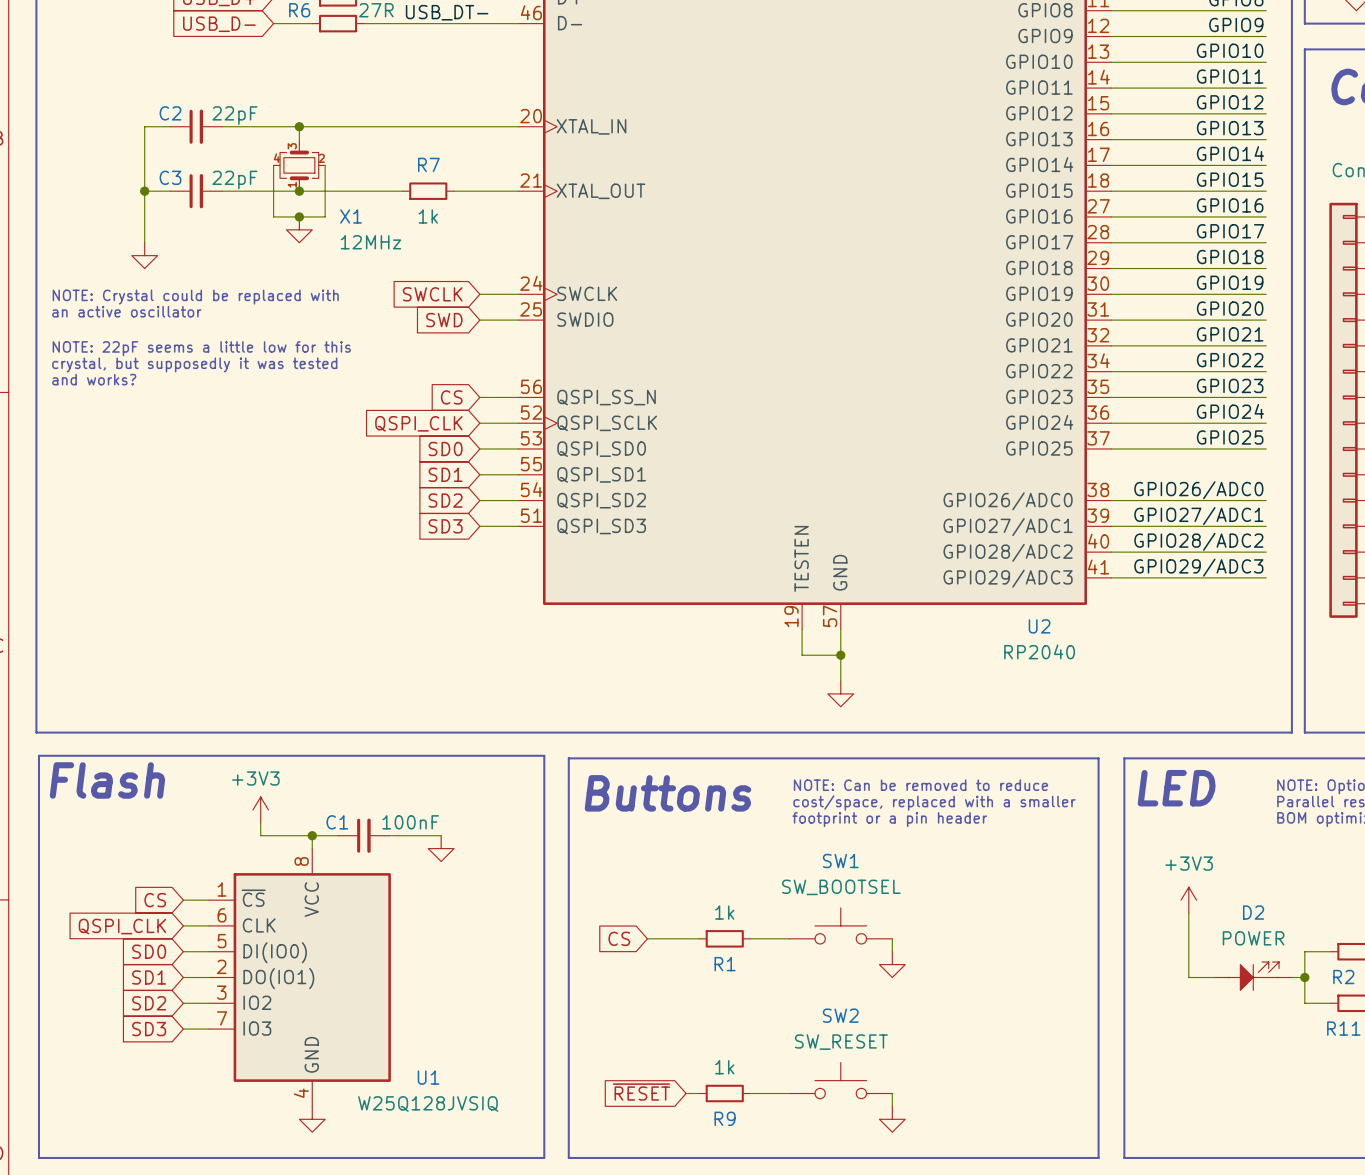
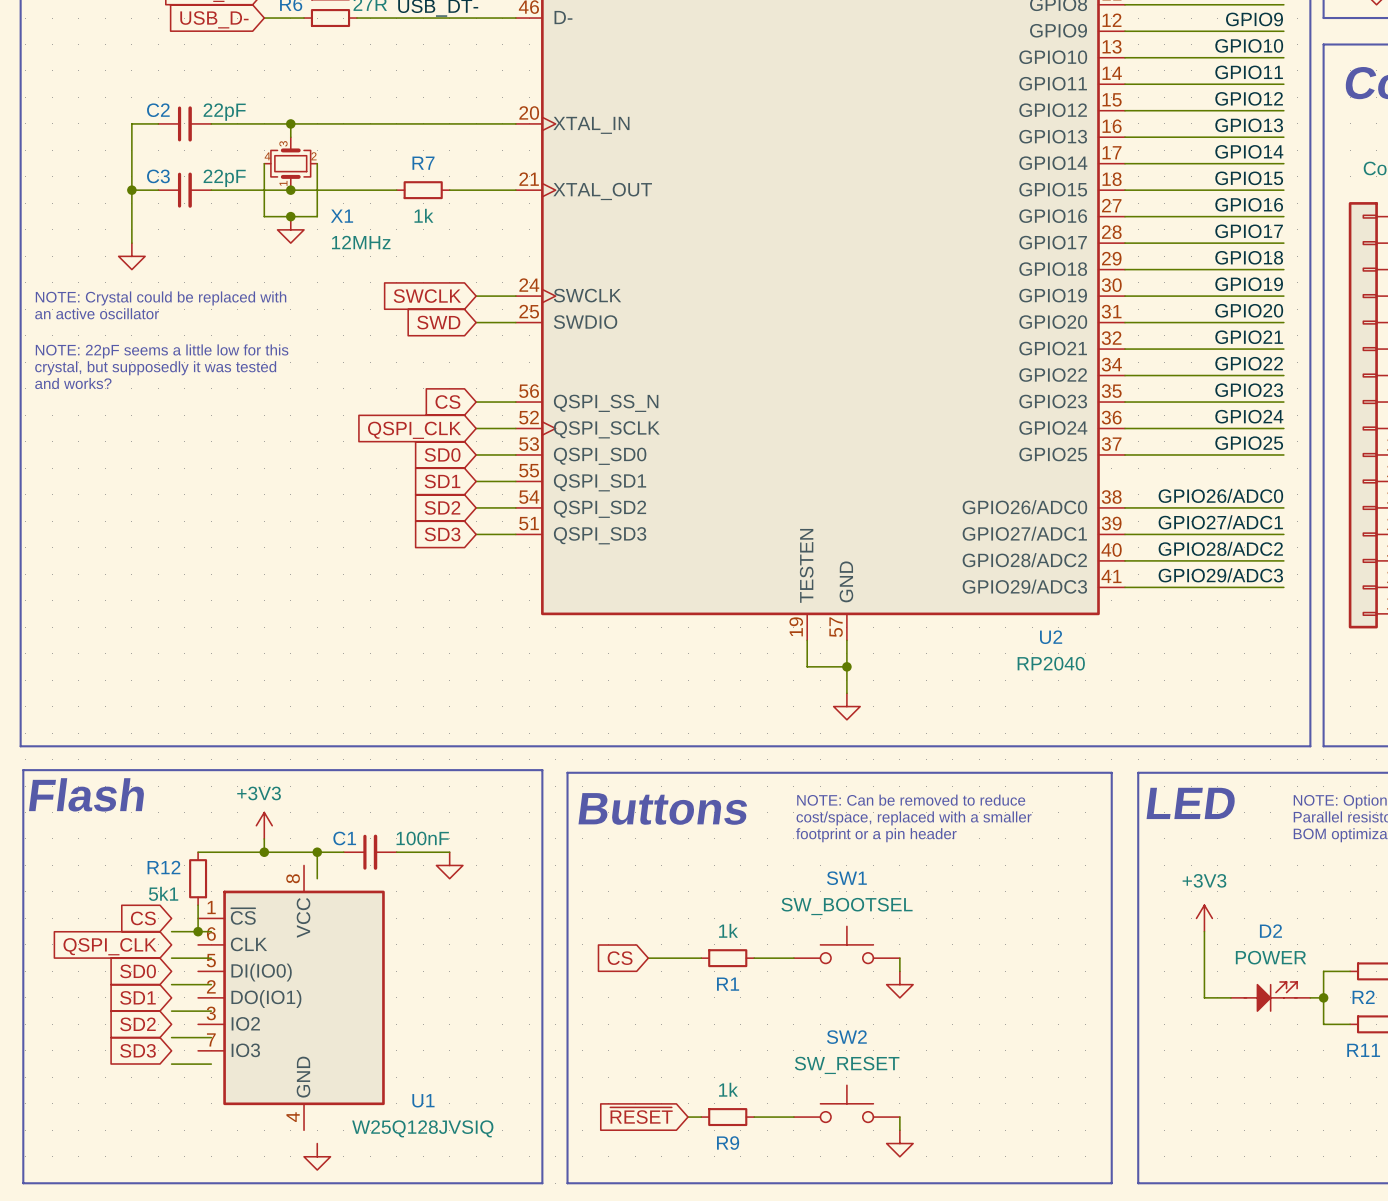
power symbol position: +3V3 (260, 809) -> +3V3 (264, 825)
wire: (260, 822) (260, 835) -> (198, 852) (251, 852)
junction: none -> (264, 852)
wire: (312, 835) (312, 848) -> (264, 838) (264, 852)
junction position: (312, 835) -> (317, 852)
wire: none -> (317, 852) (317, 878)
C1 position: (363, 835) -> (370, 852)
wire: none -> (436, 852) (449, 852)
power symbol position: (441, 848) -> (449, 865)
R12: none -> 5k1 (198, 878)
wire: none -> (198, 905) (198, 931)
wire: (183, 900) (209, 900) -> none
wire: none -> (171, 931) (211, 931)
junction: none -> (198, 931)
wire: (183, 925) (209, 925) -> none
wire: none -> (171, 958) (211, 958)
wire: (183, 951) (209, 951) -> none
wire: none -> (171, 984) (211, 984)
wire: (183, 977) (209, 977) -> none
wire: none -> (171, 1011) (211, 1011)
wire: (183, 1003) (209, 1003) -> none
wire: none -> (171, 1037) (211, 1037)
wire: (183, 1029) (209, 1029) -> none
wire: none -> (171, 1064) (211, 1064)
power symbol position: (312, 1119) -> (317, 1156)

